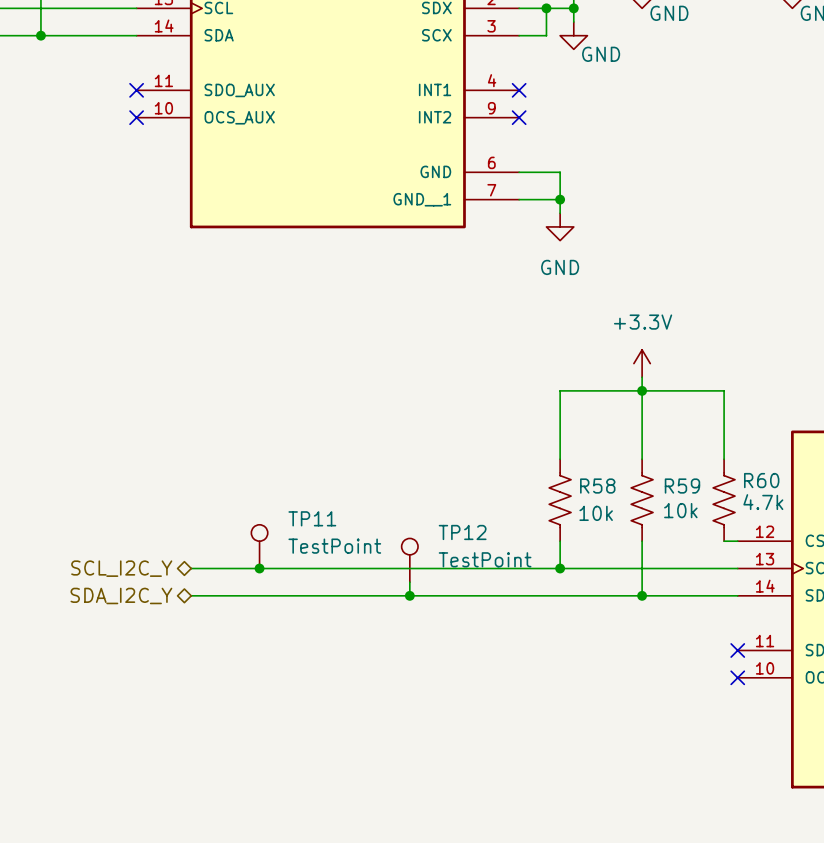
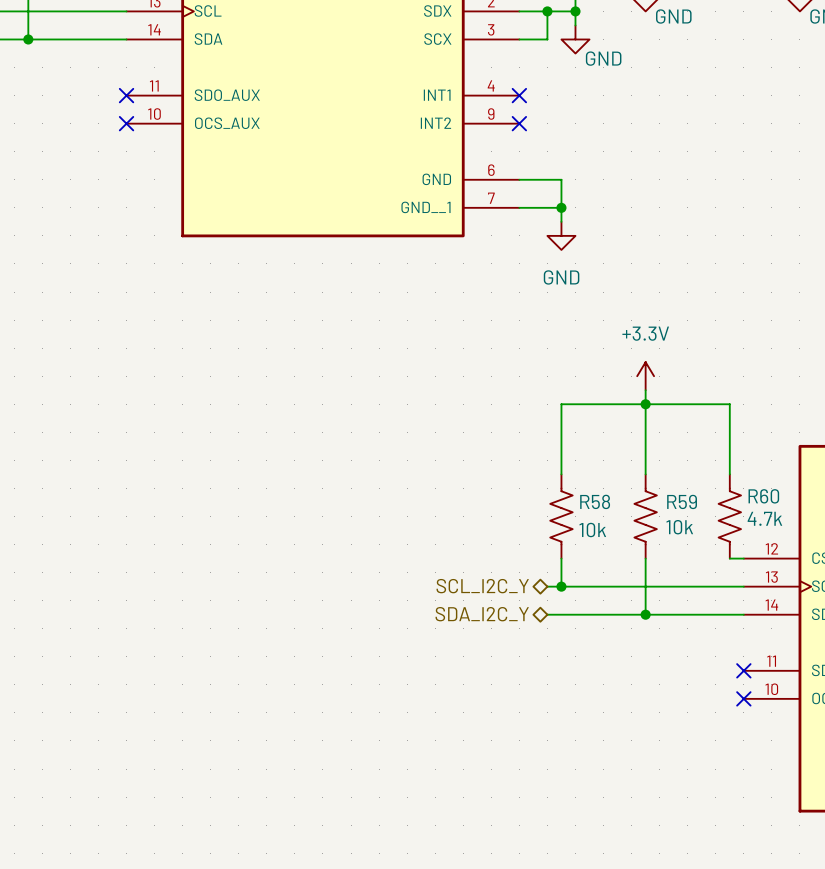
TP11: TestPoint (259, 546) -> none
TP12: TestPoint (409, 560) -> none
hierarchical label: SCL_I2C_Y (121, 568) -> none
wire: (191, 568) (546, 568) -> none
junction: (259, 568) -> none
hierarchical label: none -> SCL_I2C_Y (482, 586)
wire: (409, 582) (409, 595) -> none
hierarchical label: SDA_I2C_Y (121, 595) -> none
wire: (191, 595) (546, 595) -> none
junction: (409, 595) -> none
hierarchical label: none -> SDA_I2C_Y (482, 614)

